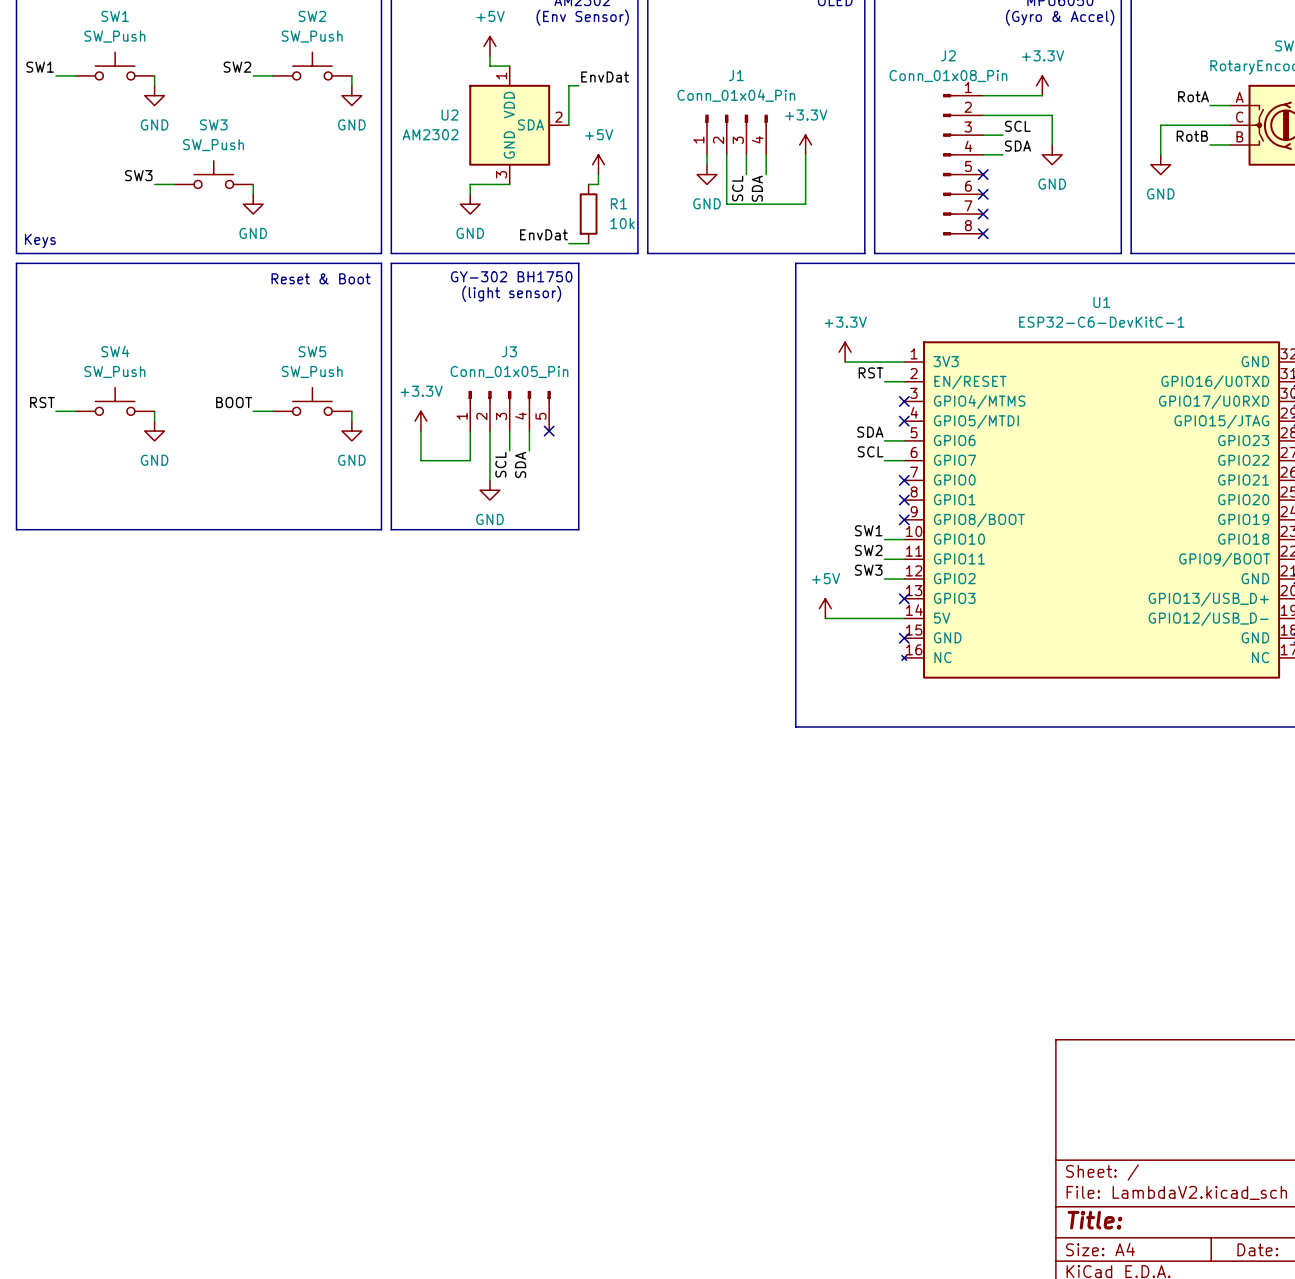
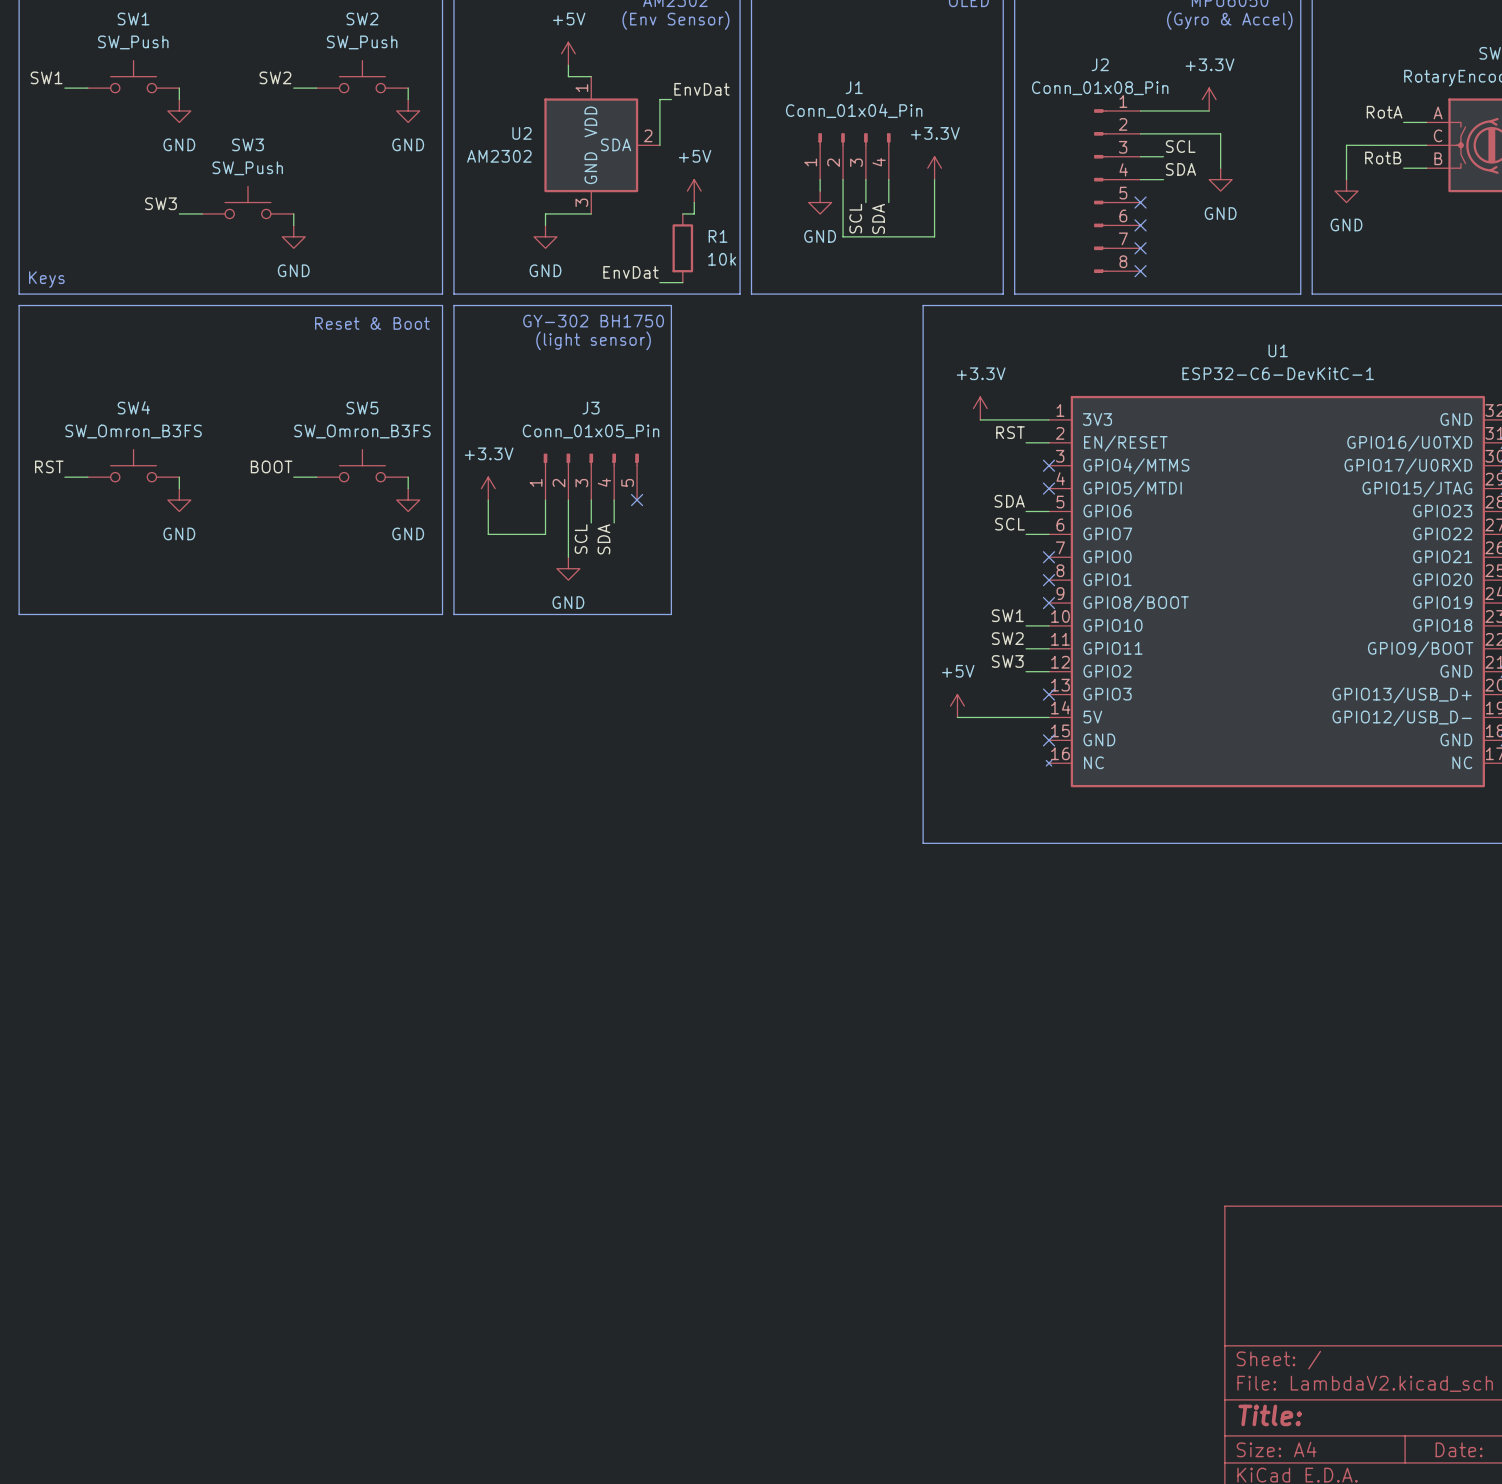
SW4 value: SW_Push (114, 371) -> SW_Omron_B3FS (133, 431)
SW5 value: SW_Push (312, 371) -> SW_Omron_B3FS (362, 431)

